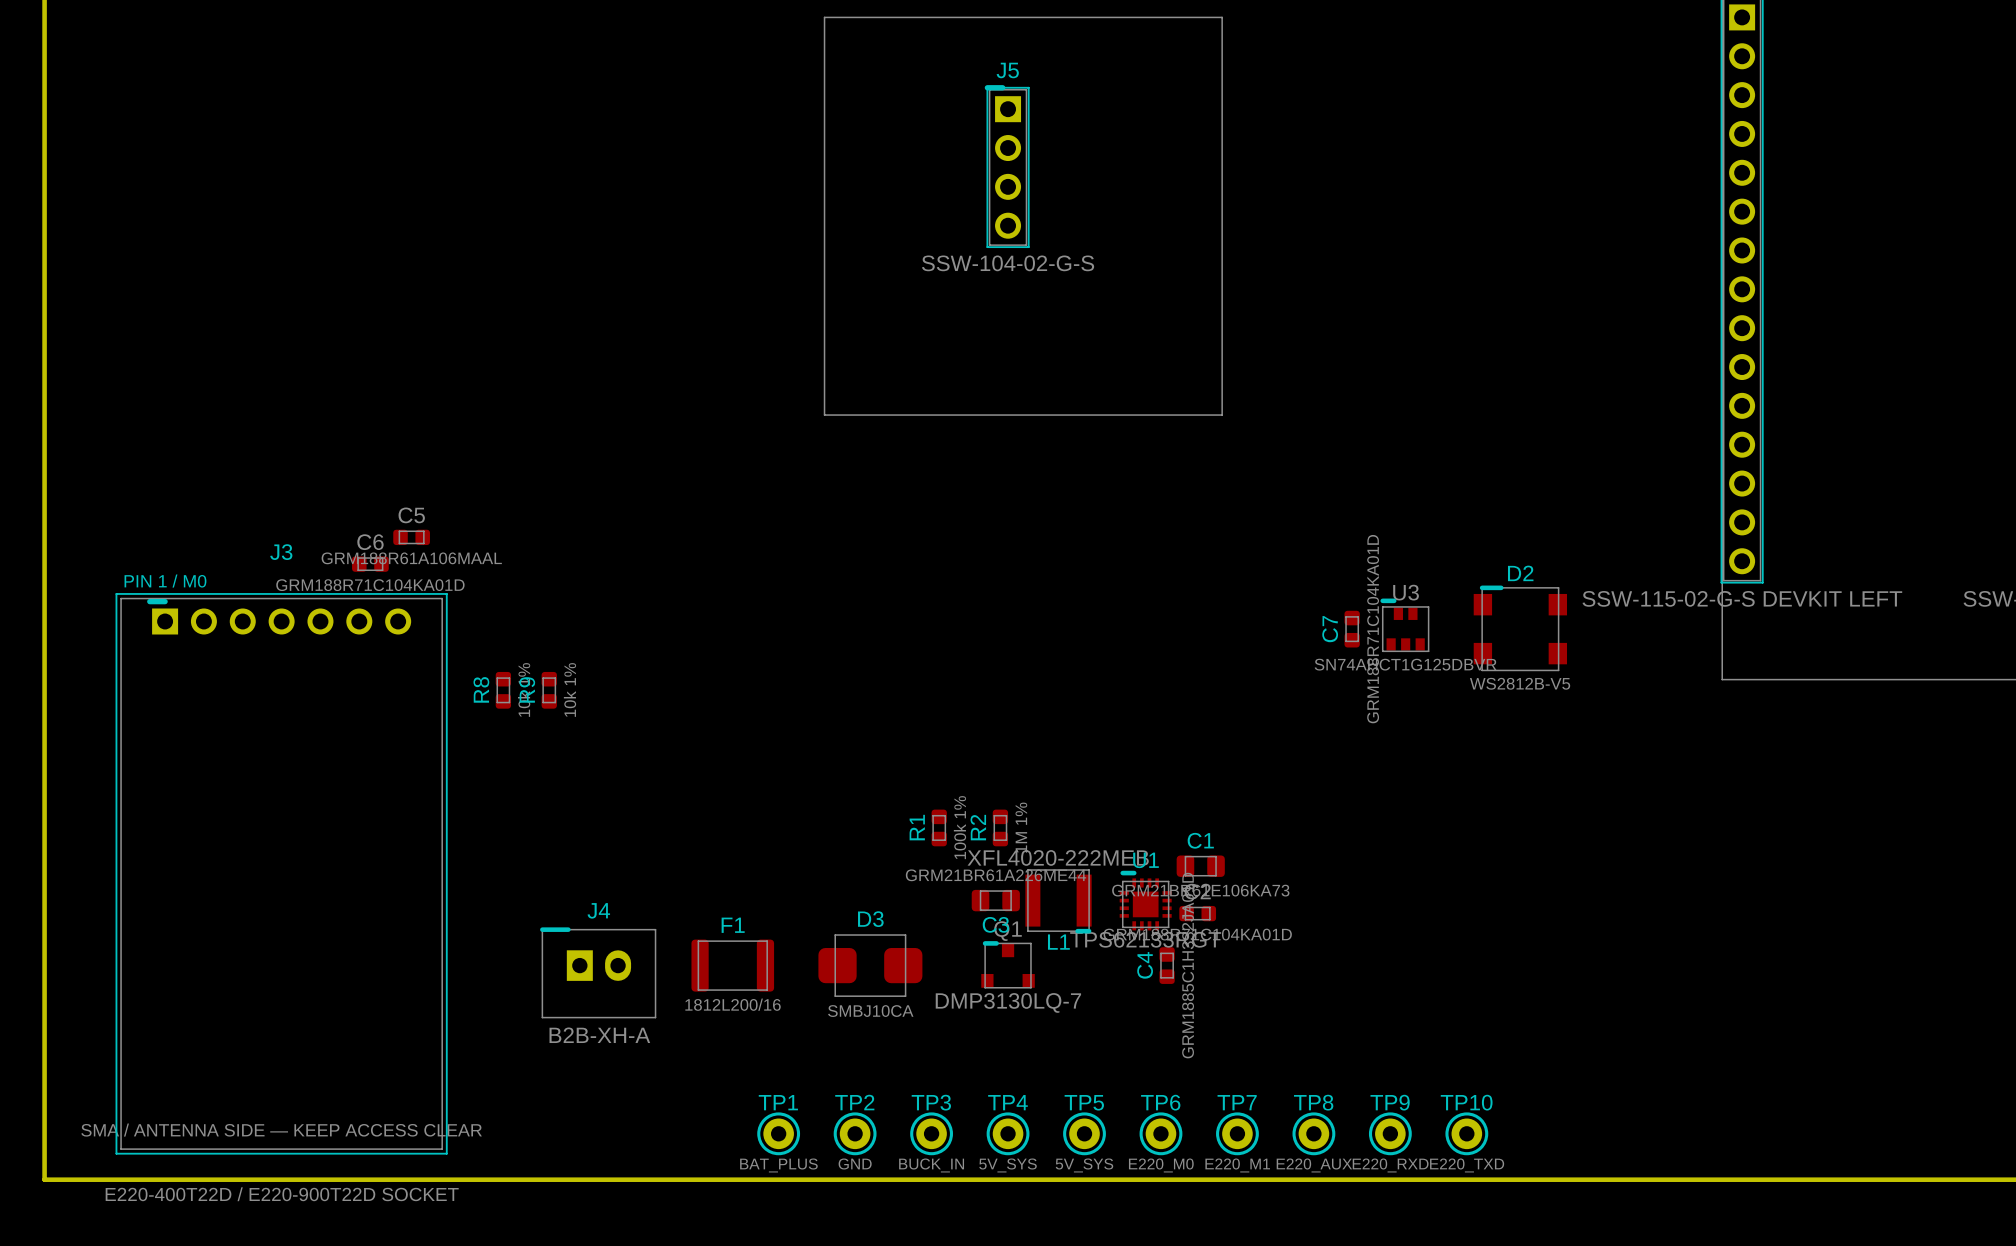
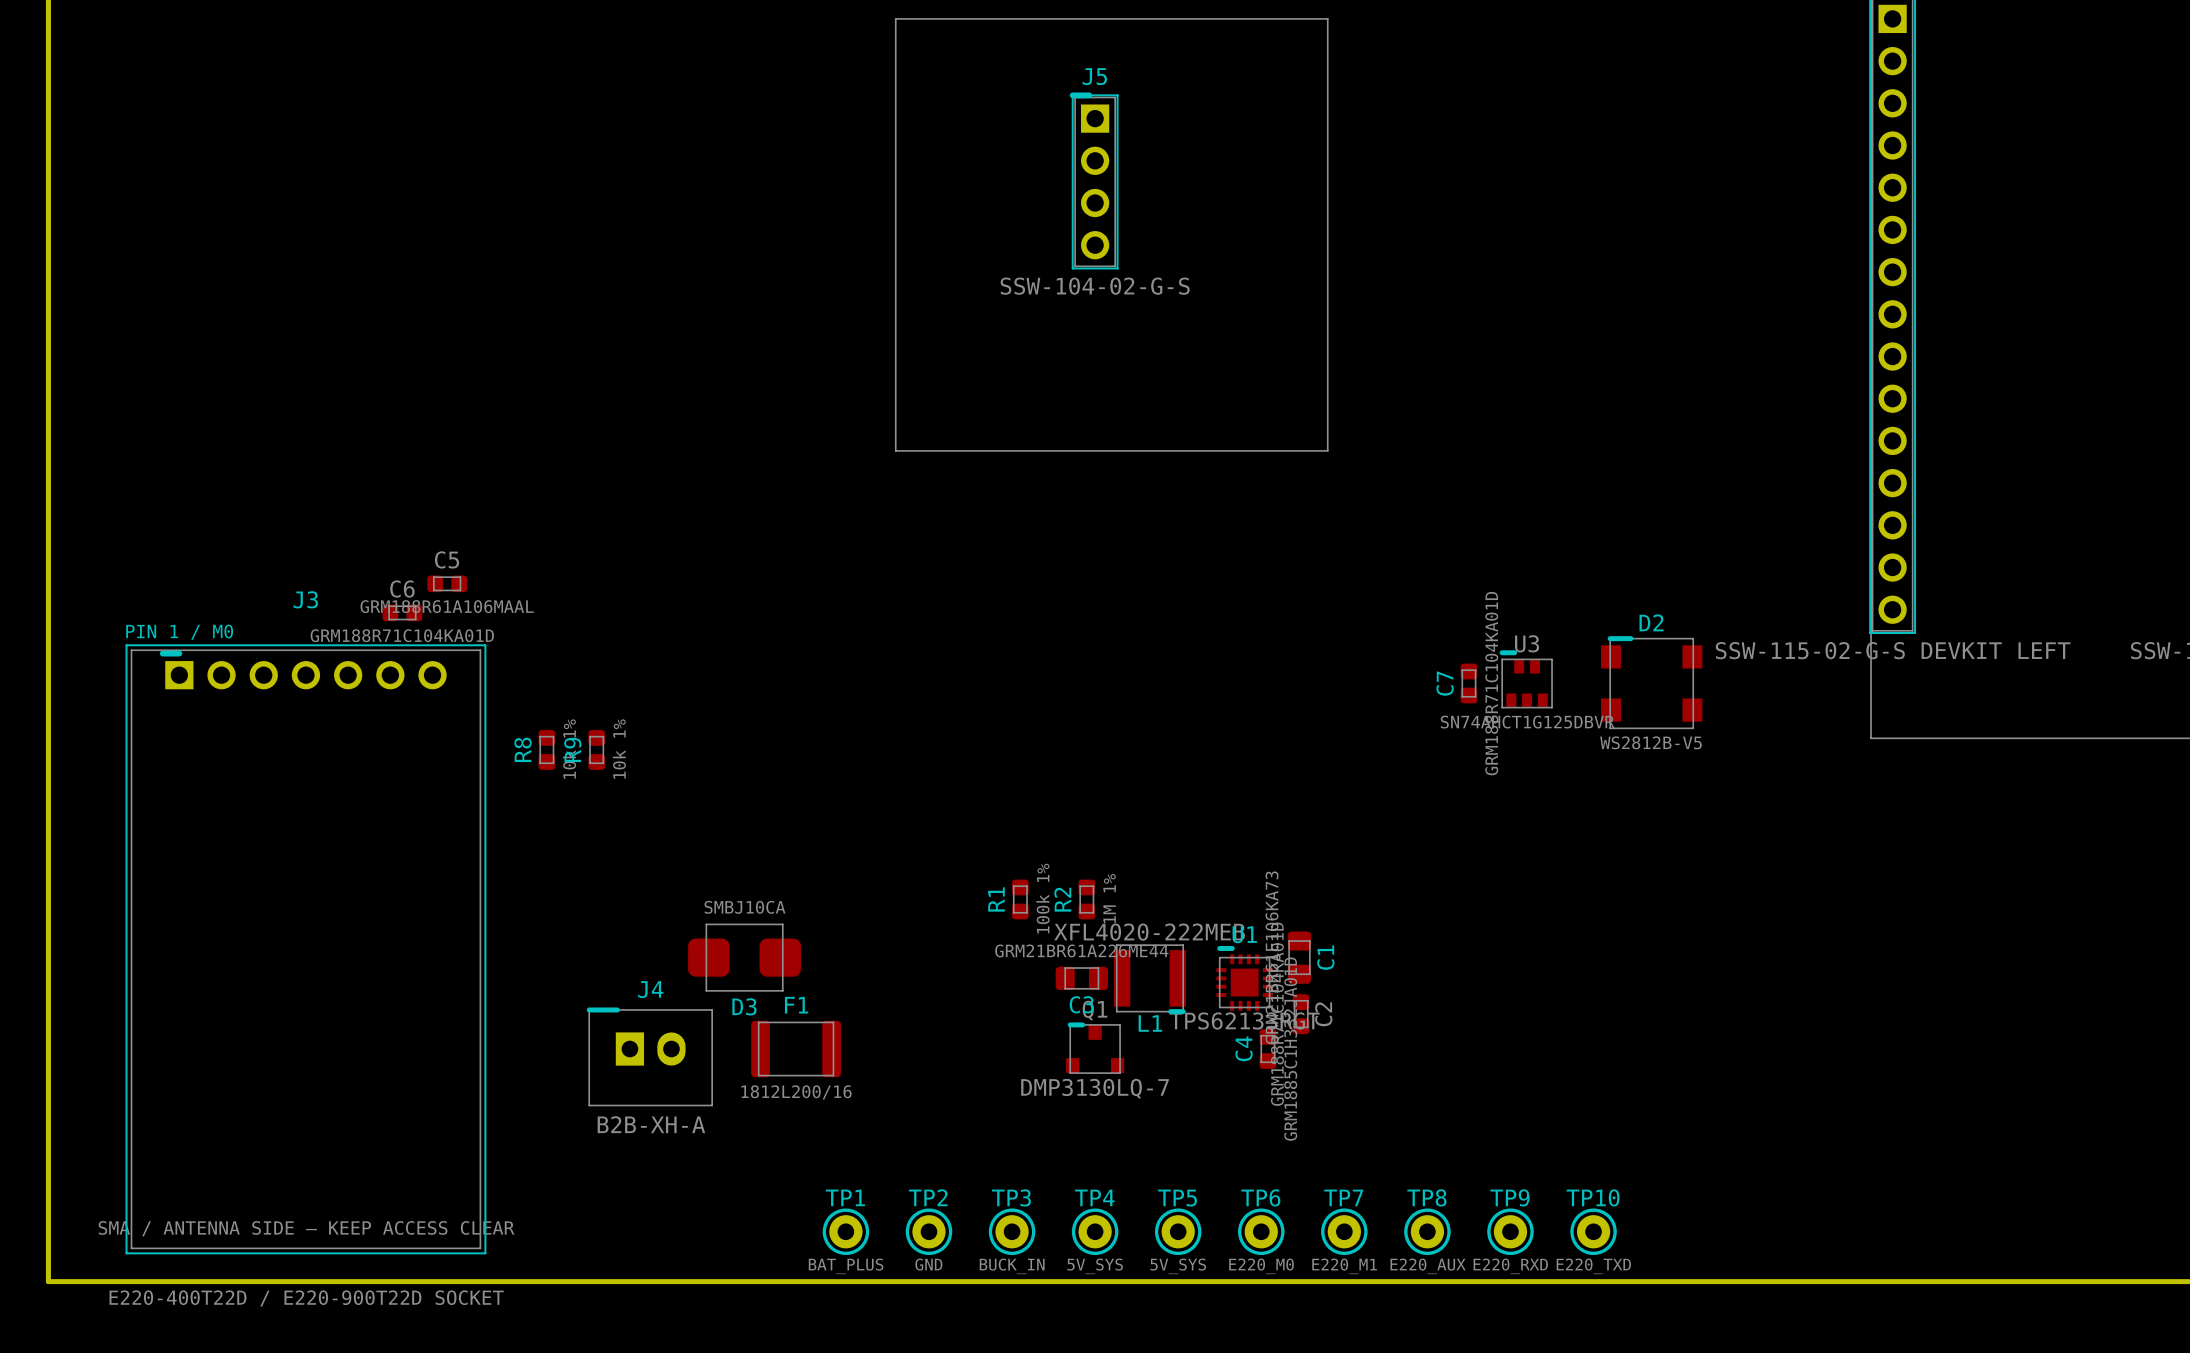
C1 rotation: 0° (1200, 866) -> 90° clockwise (1299, 957)
C2 rotation: 0° (1197, 913) -> 90° clockwise (1301, 1014)
D3 name position: D3 (870, 919) -> D3 (744, 1006)
D3 position: (870, 965) -> (744, 957)
D3 value position: SMBJ10CA (870, 1011) -> SMBJ10CA (744, 907)

